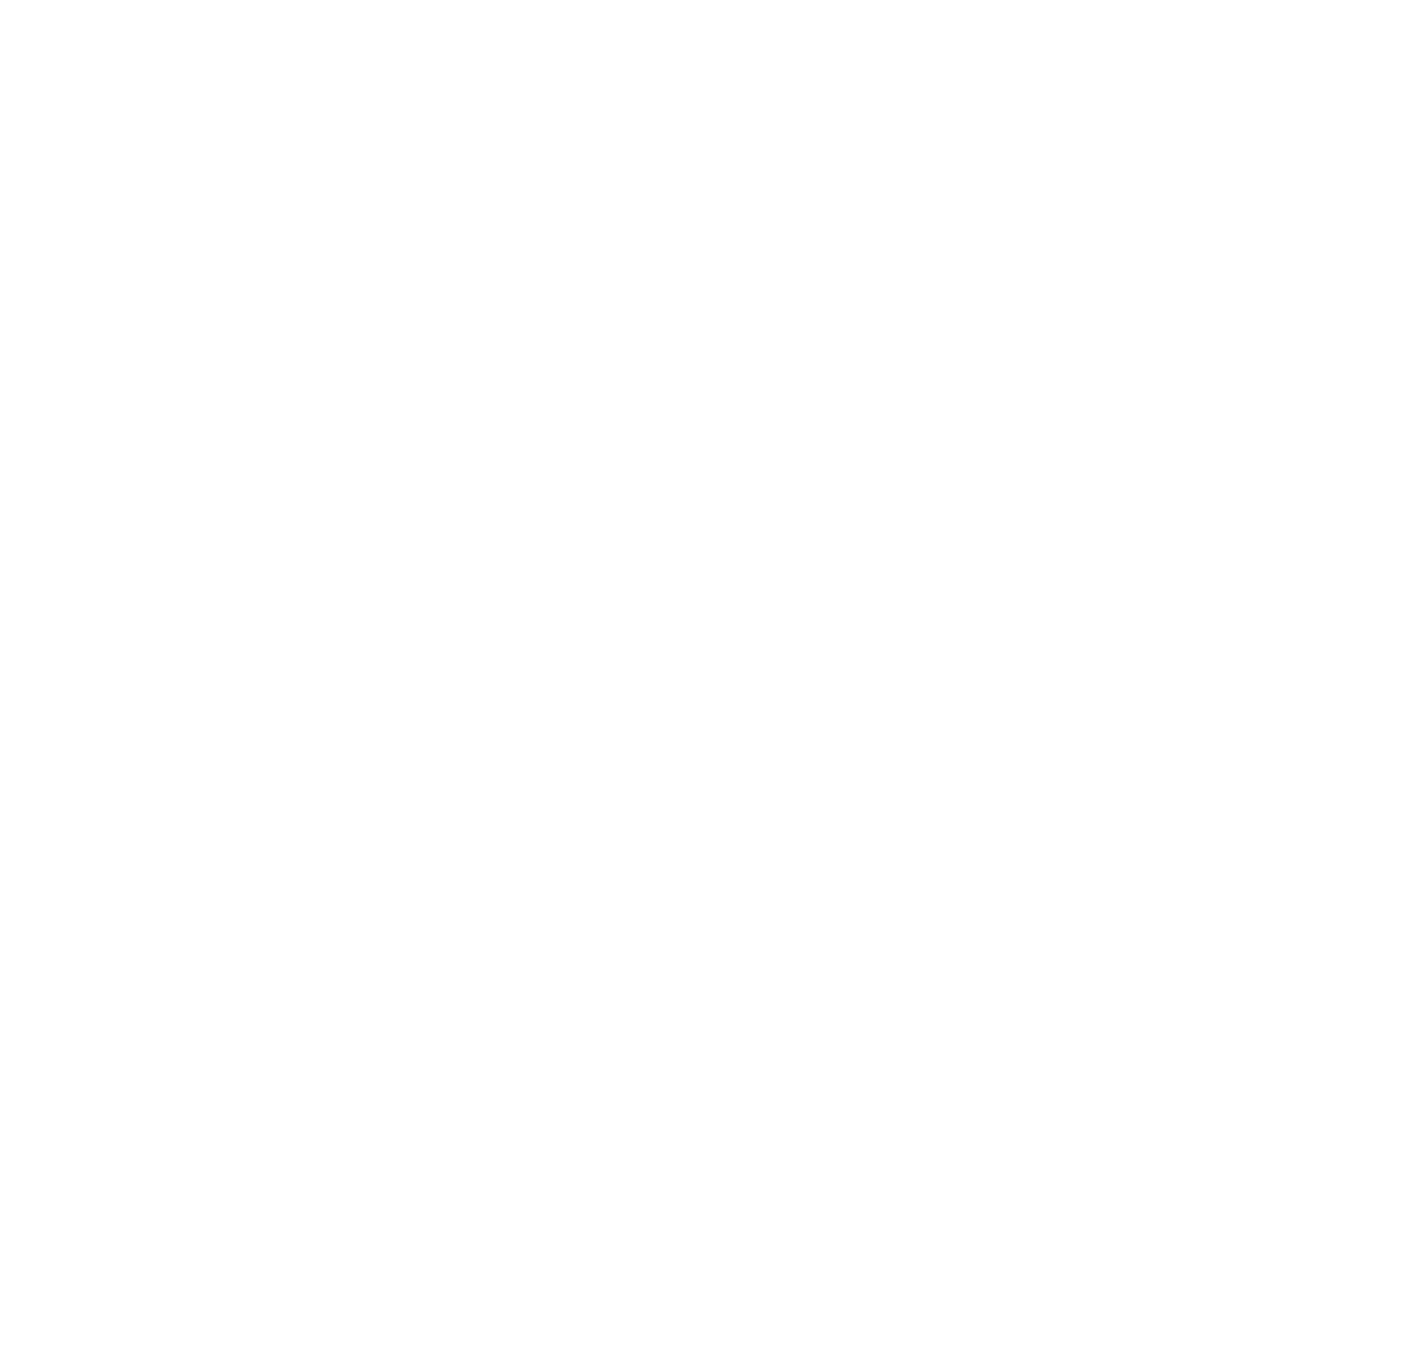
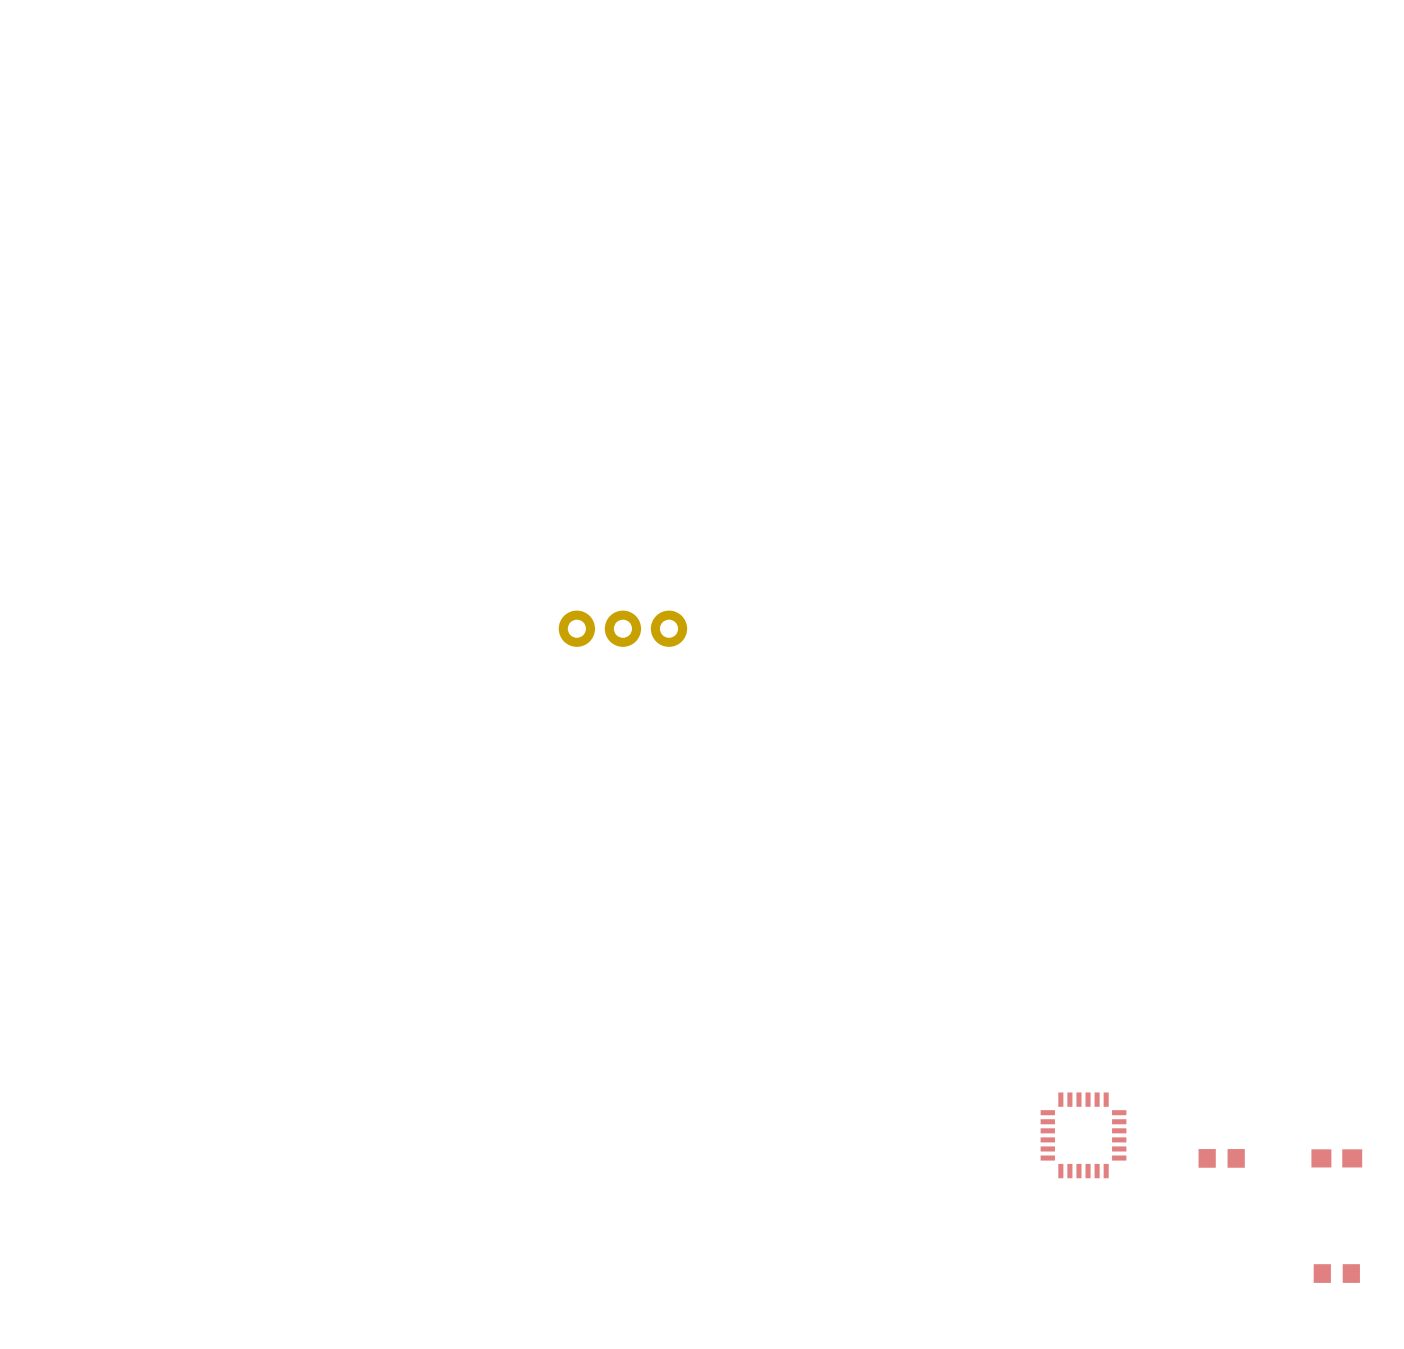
part: none -> (622, 628)
part: none -> (1083, 1135)
part: none -> (1221, 1158)
part: none -> (1336, 1158)
part: none -> (1336, 1273)

